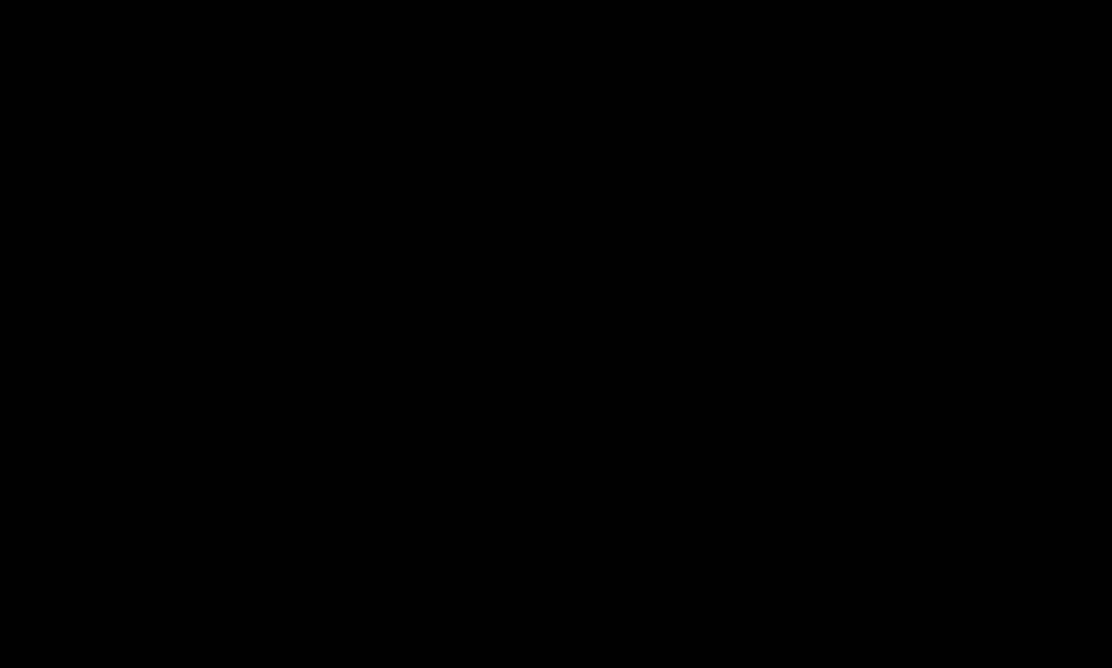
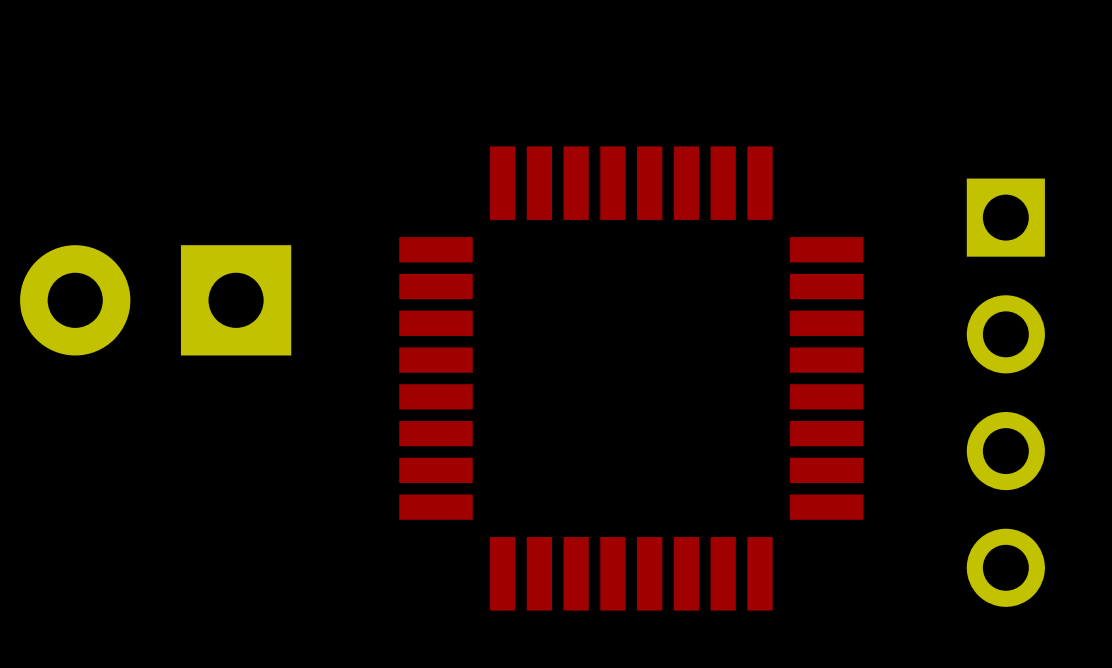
part: none -> (155, 300)
part: none -> (631, 378)
part: none -> (1005, 392)

